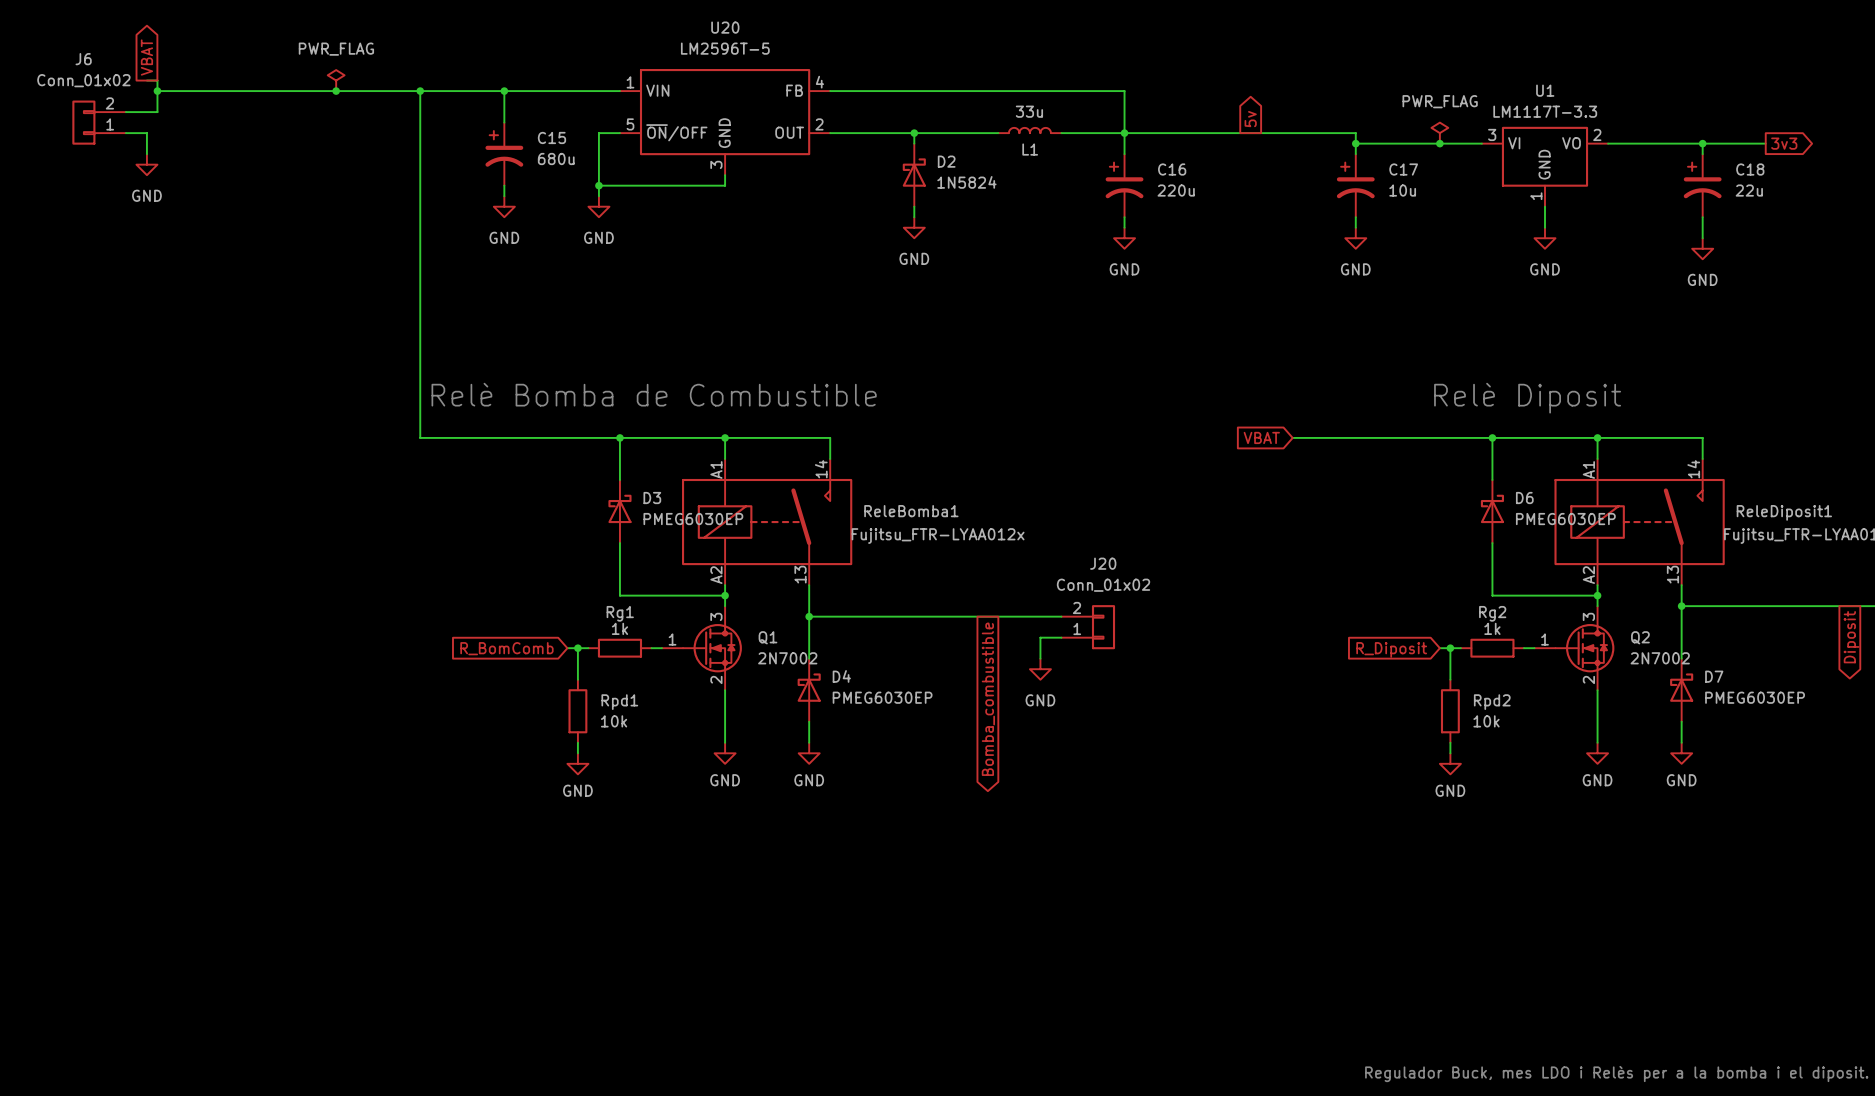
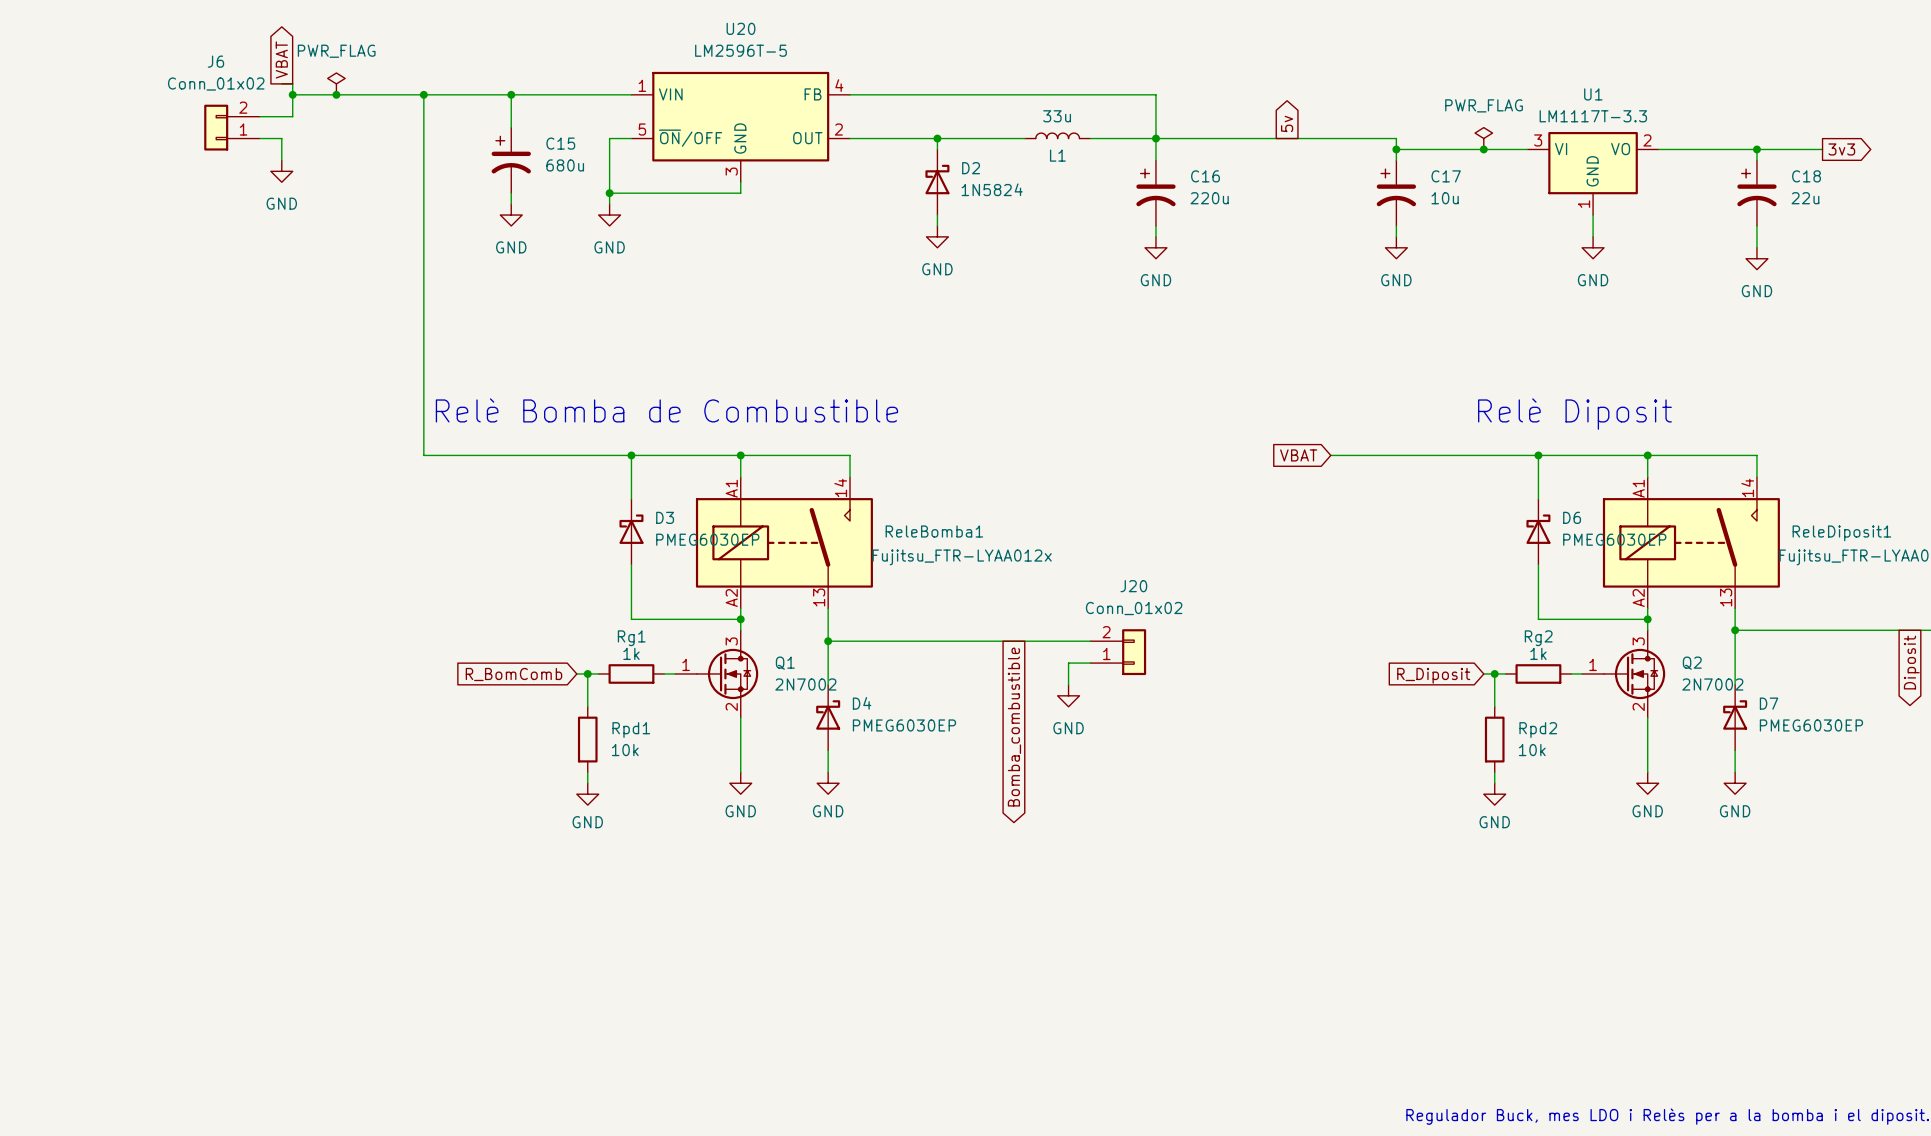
global label position: VBAT (146, 57) -> VBAT (281, 59)
wire: (146, 80) (157, 80) (157, 112) (125, 112) -> (281, 83) (292, 83) (292, 116) (259, 116)
wire: (157, 91) (294, 91) -> none
junction: (157, 91) -> none
junction: none -> (292, 94)
J6 position: (99, 122) -> (232, 127)
wire: (125, 133) (146, 133) (146, 154) -> (259, 138) (281, 138) (281, 160)
power symbol position: GND (146, 164) -> GND (281, 171)

